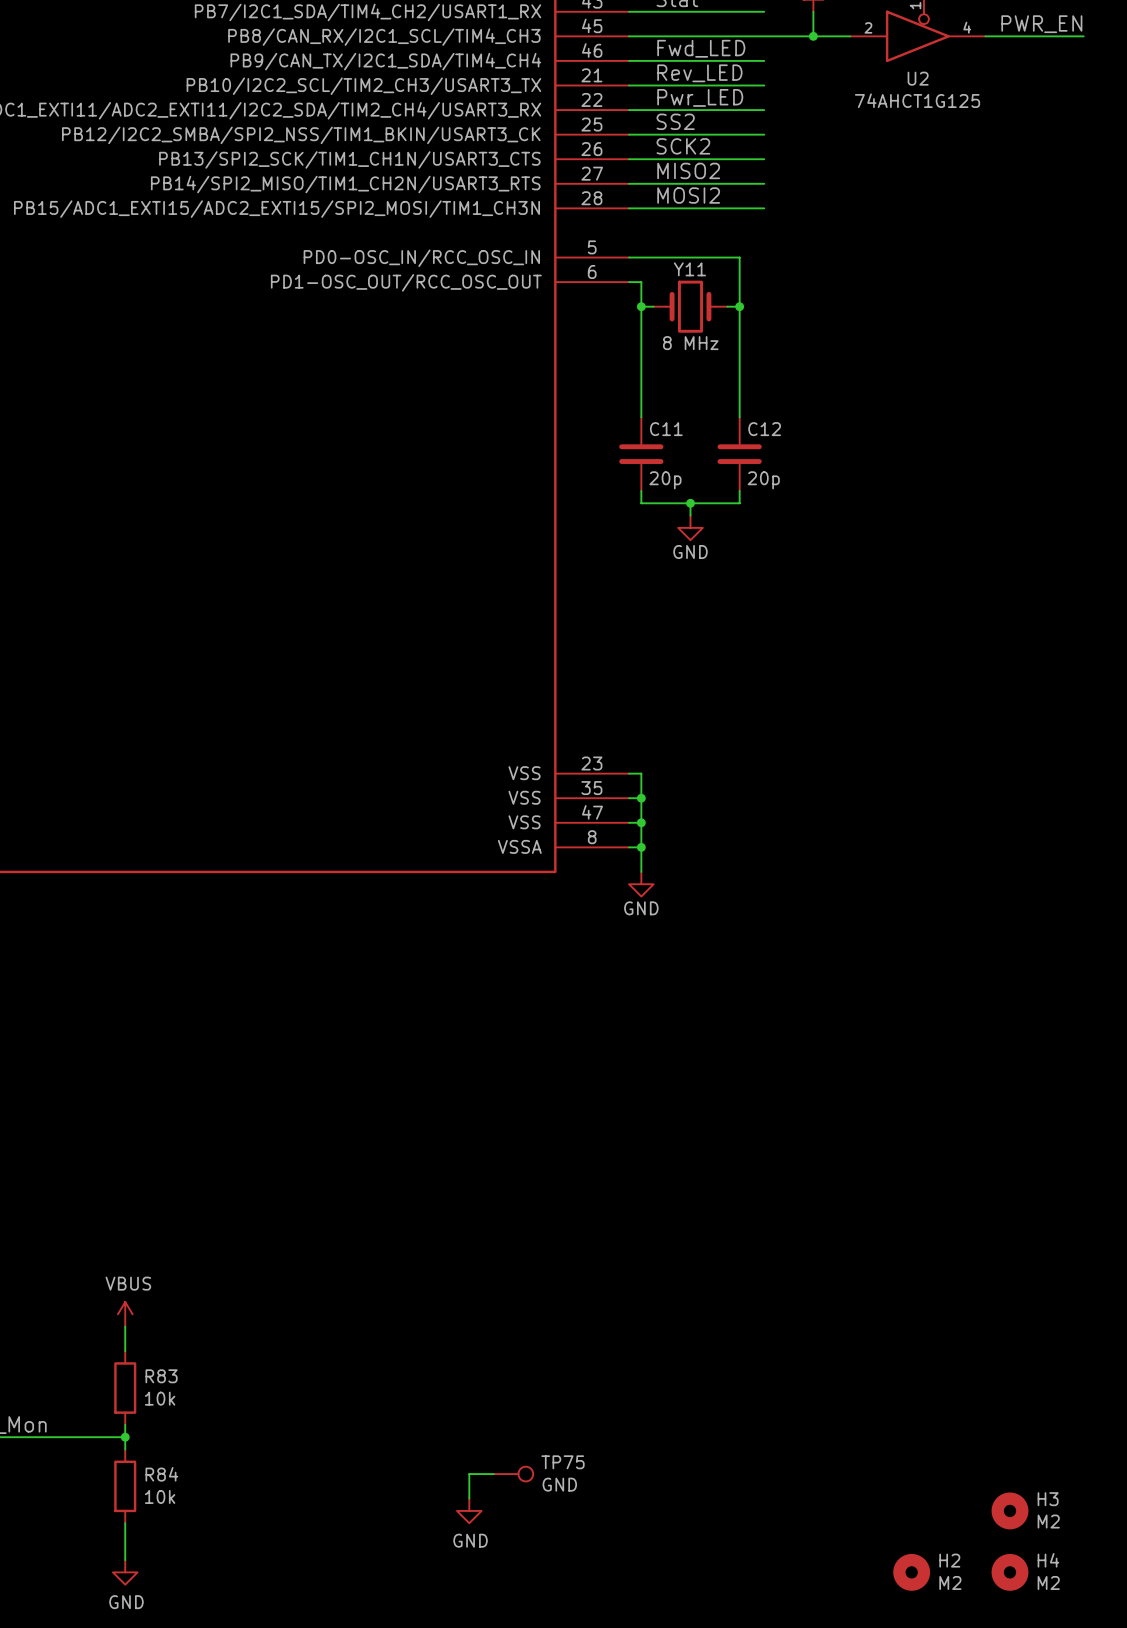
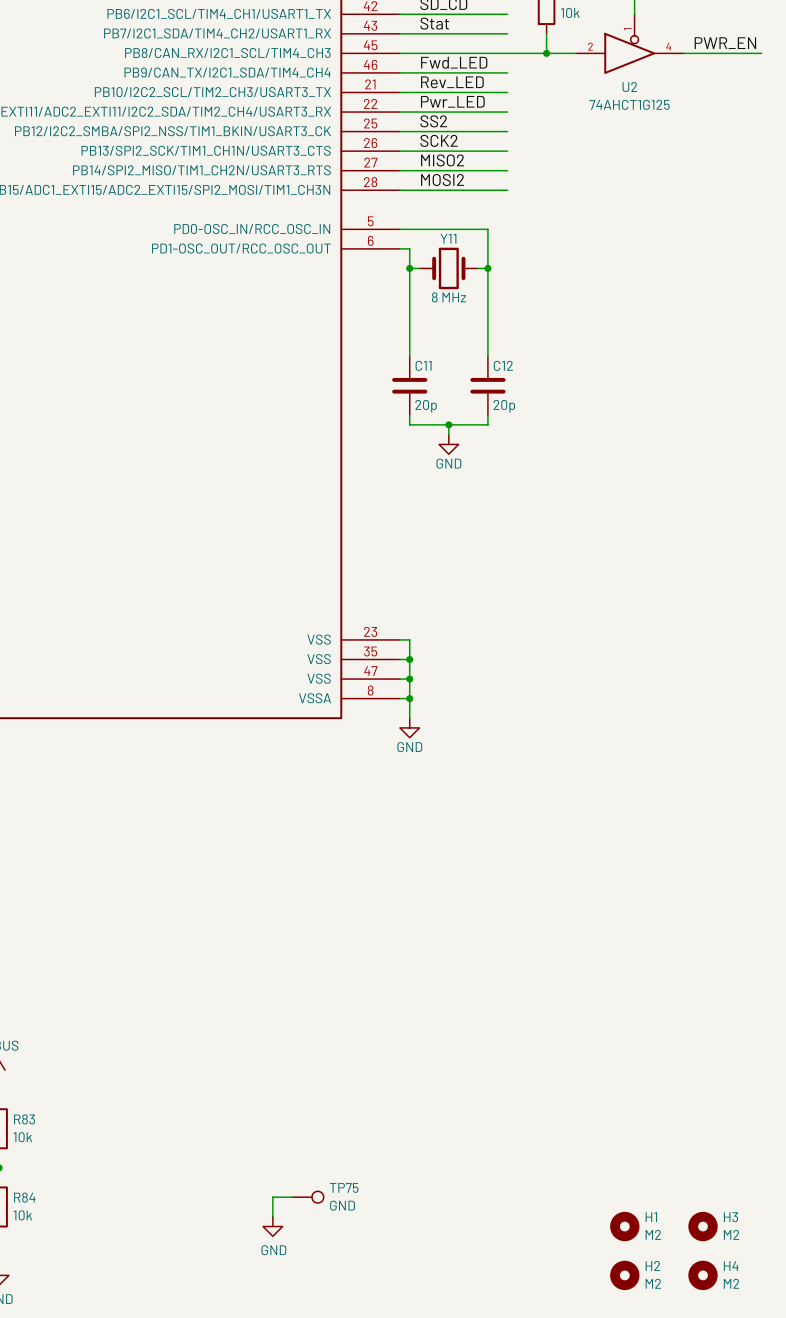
H1: none -> M2 (624, 1226)

